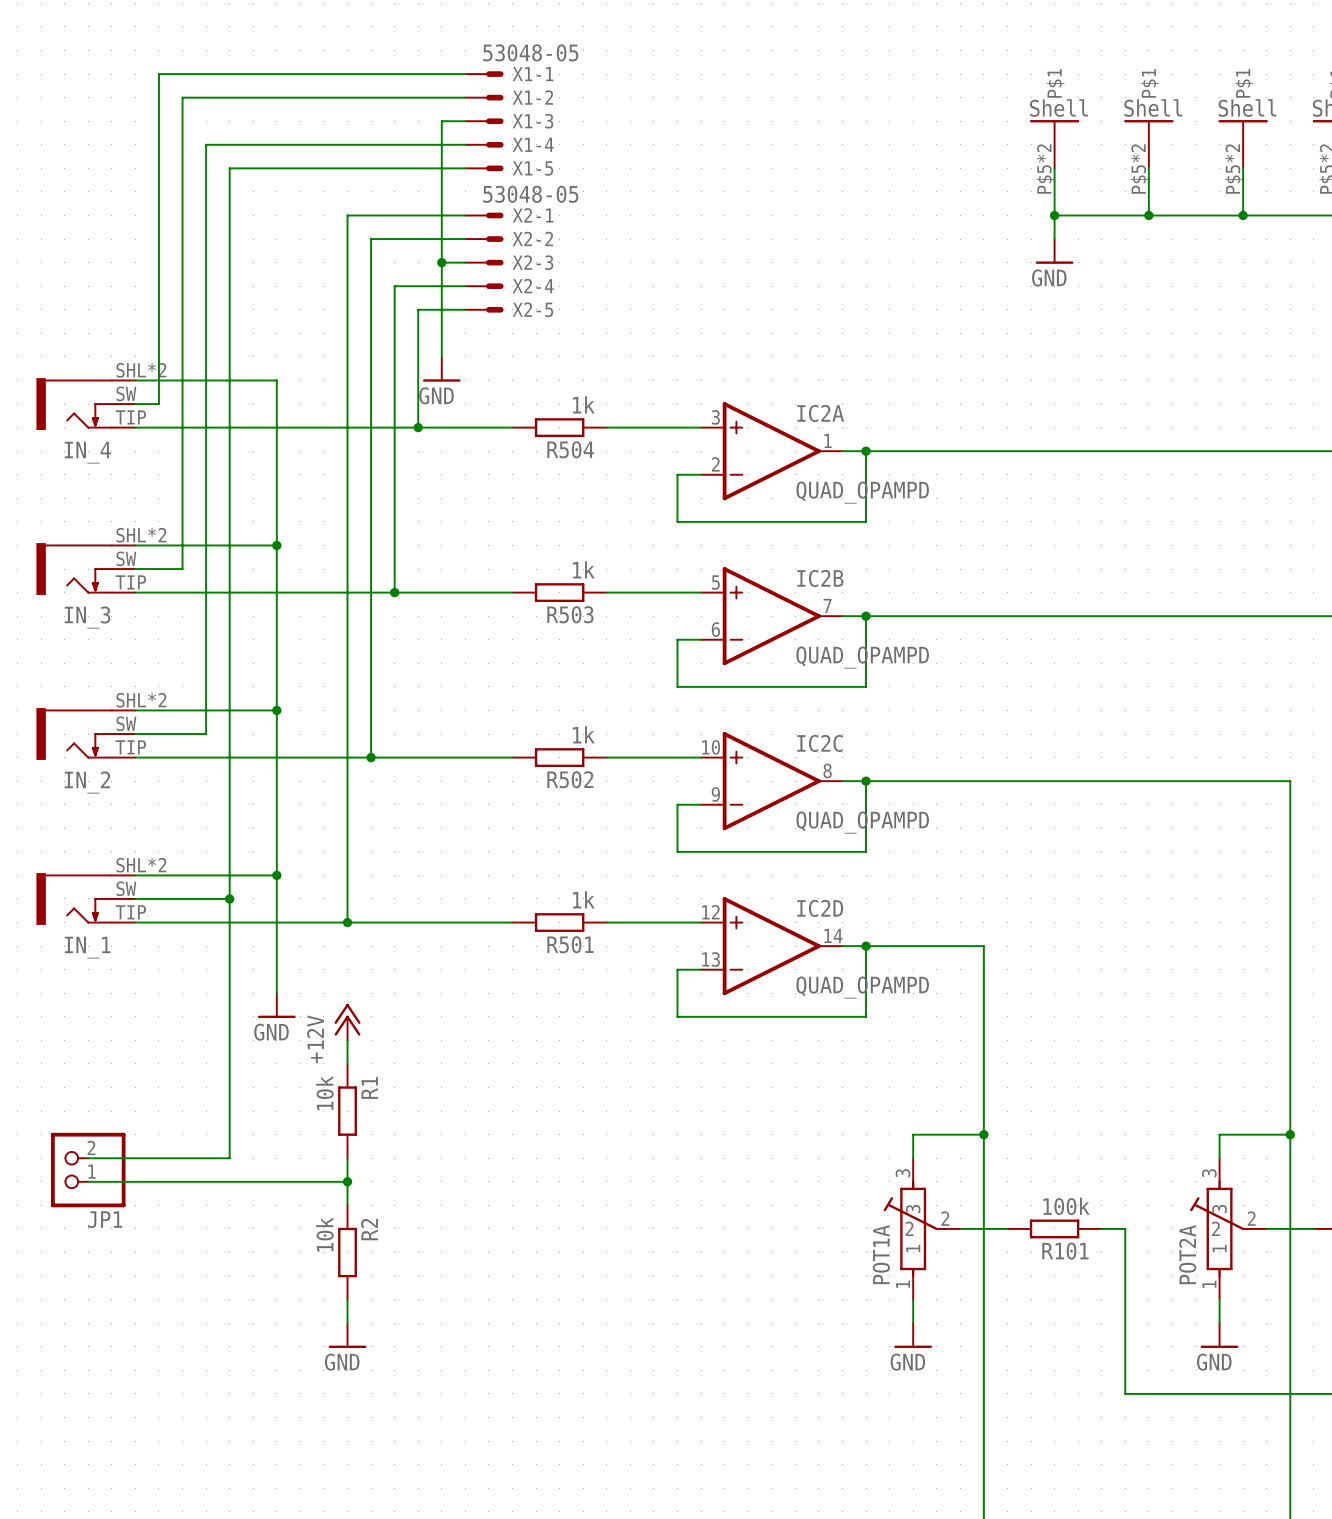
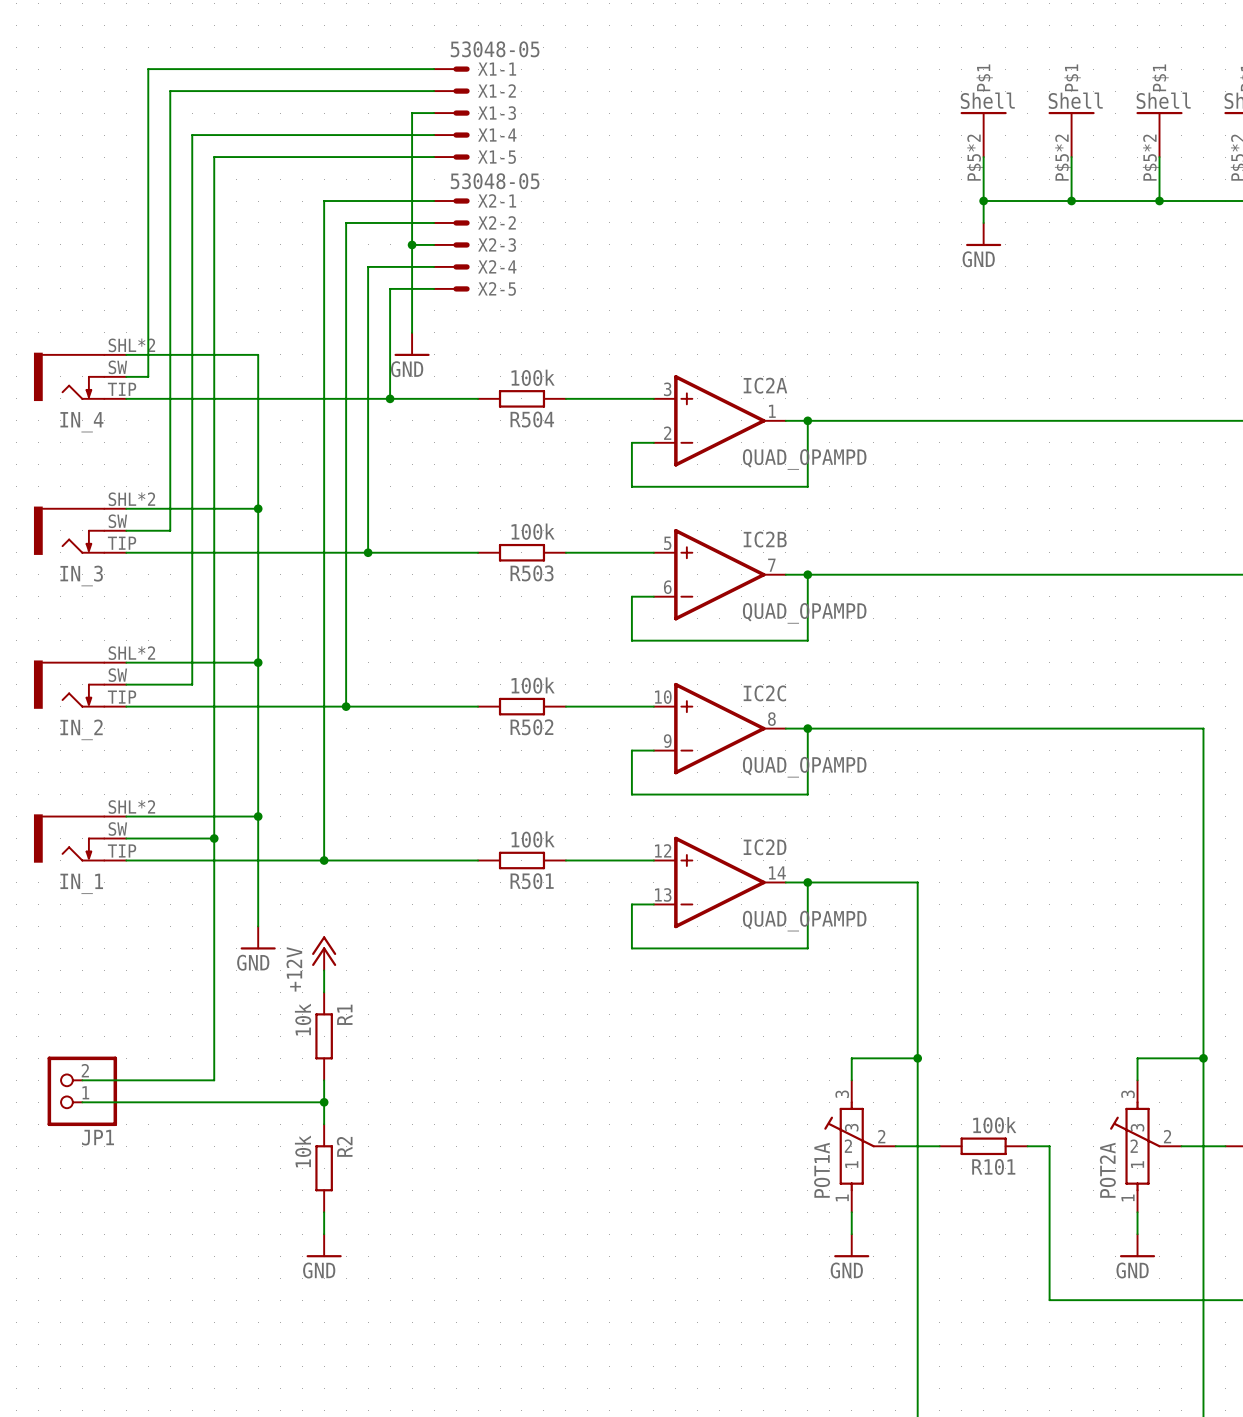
R504 value: 1k (583, 404) -> 100k (533, 377)
R503 value: 1k (583, 569) -> 100k (533, 531)
R502 value: 1k (583, 734) -> 100k (533, 685)
R501 value: 1k (583, 899) -> 100k (533, 839)

